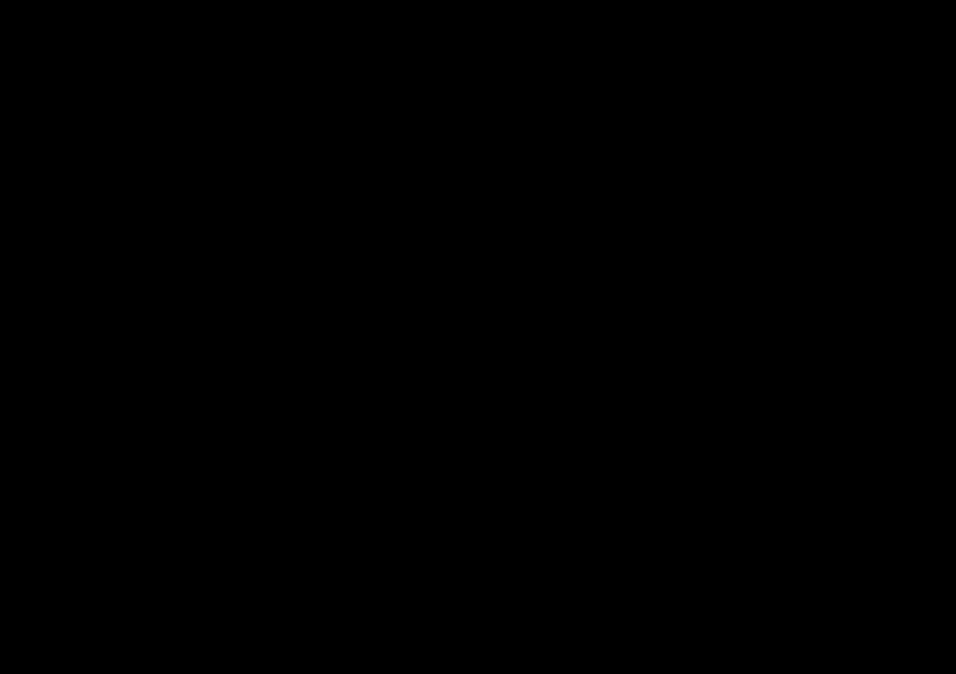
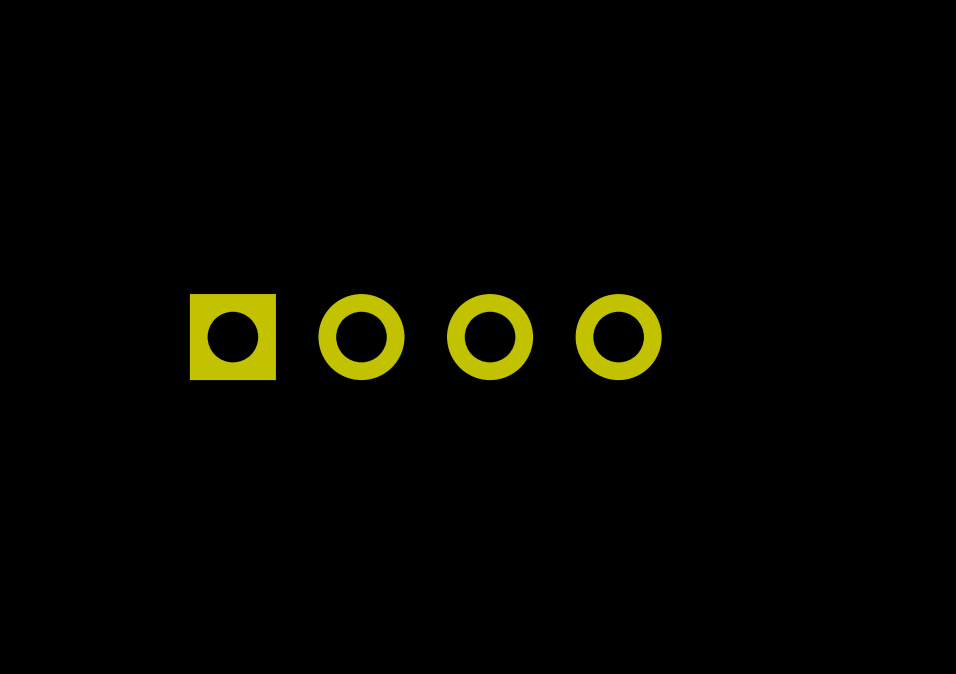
part: none -> (425, 337)

